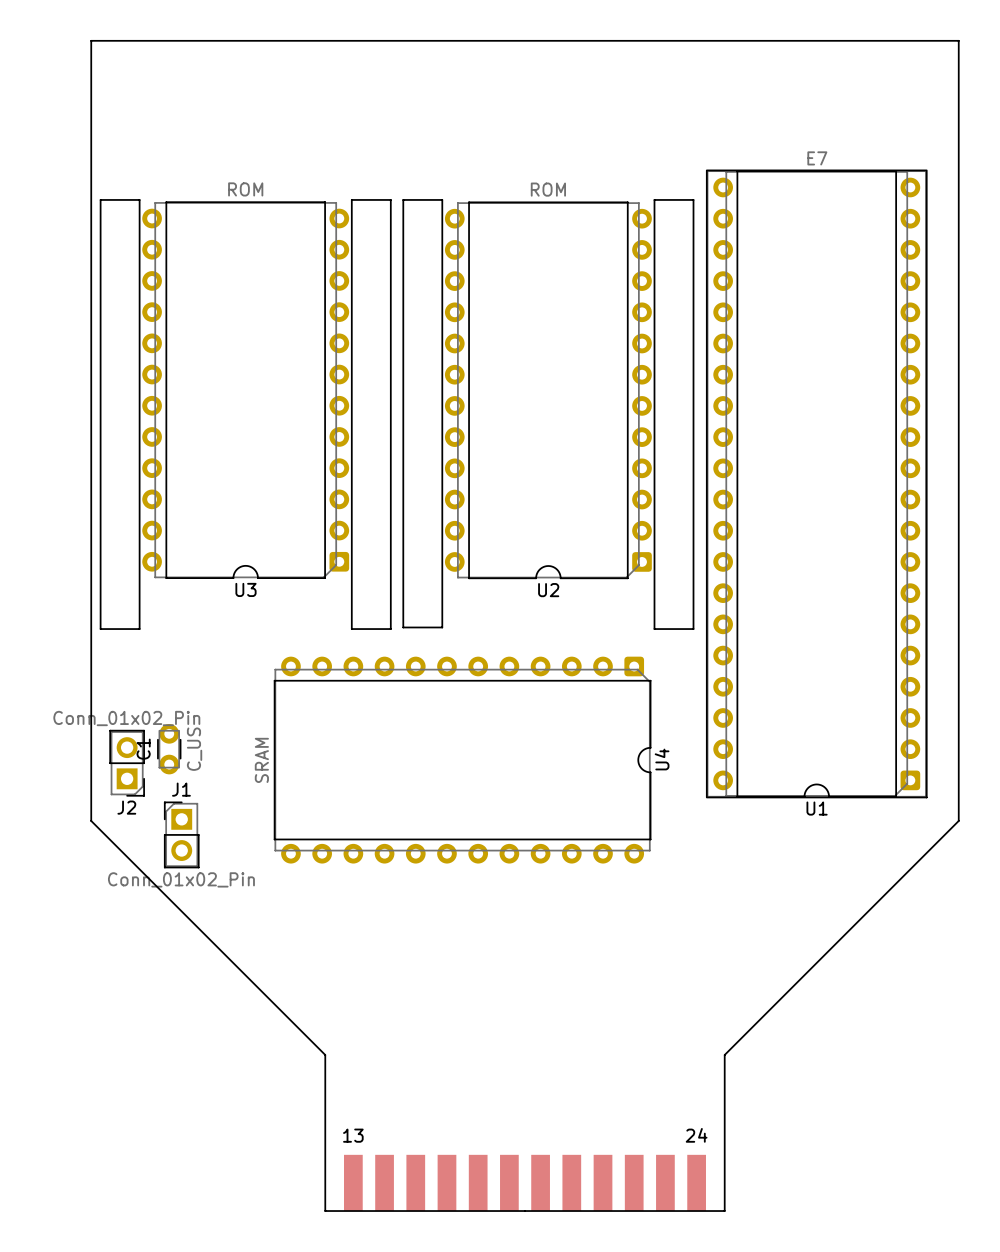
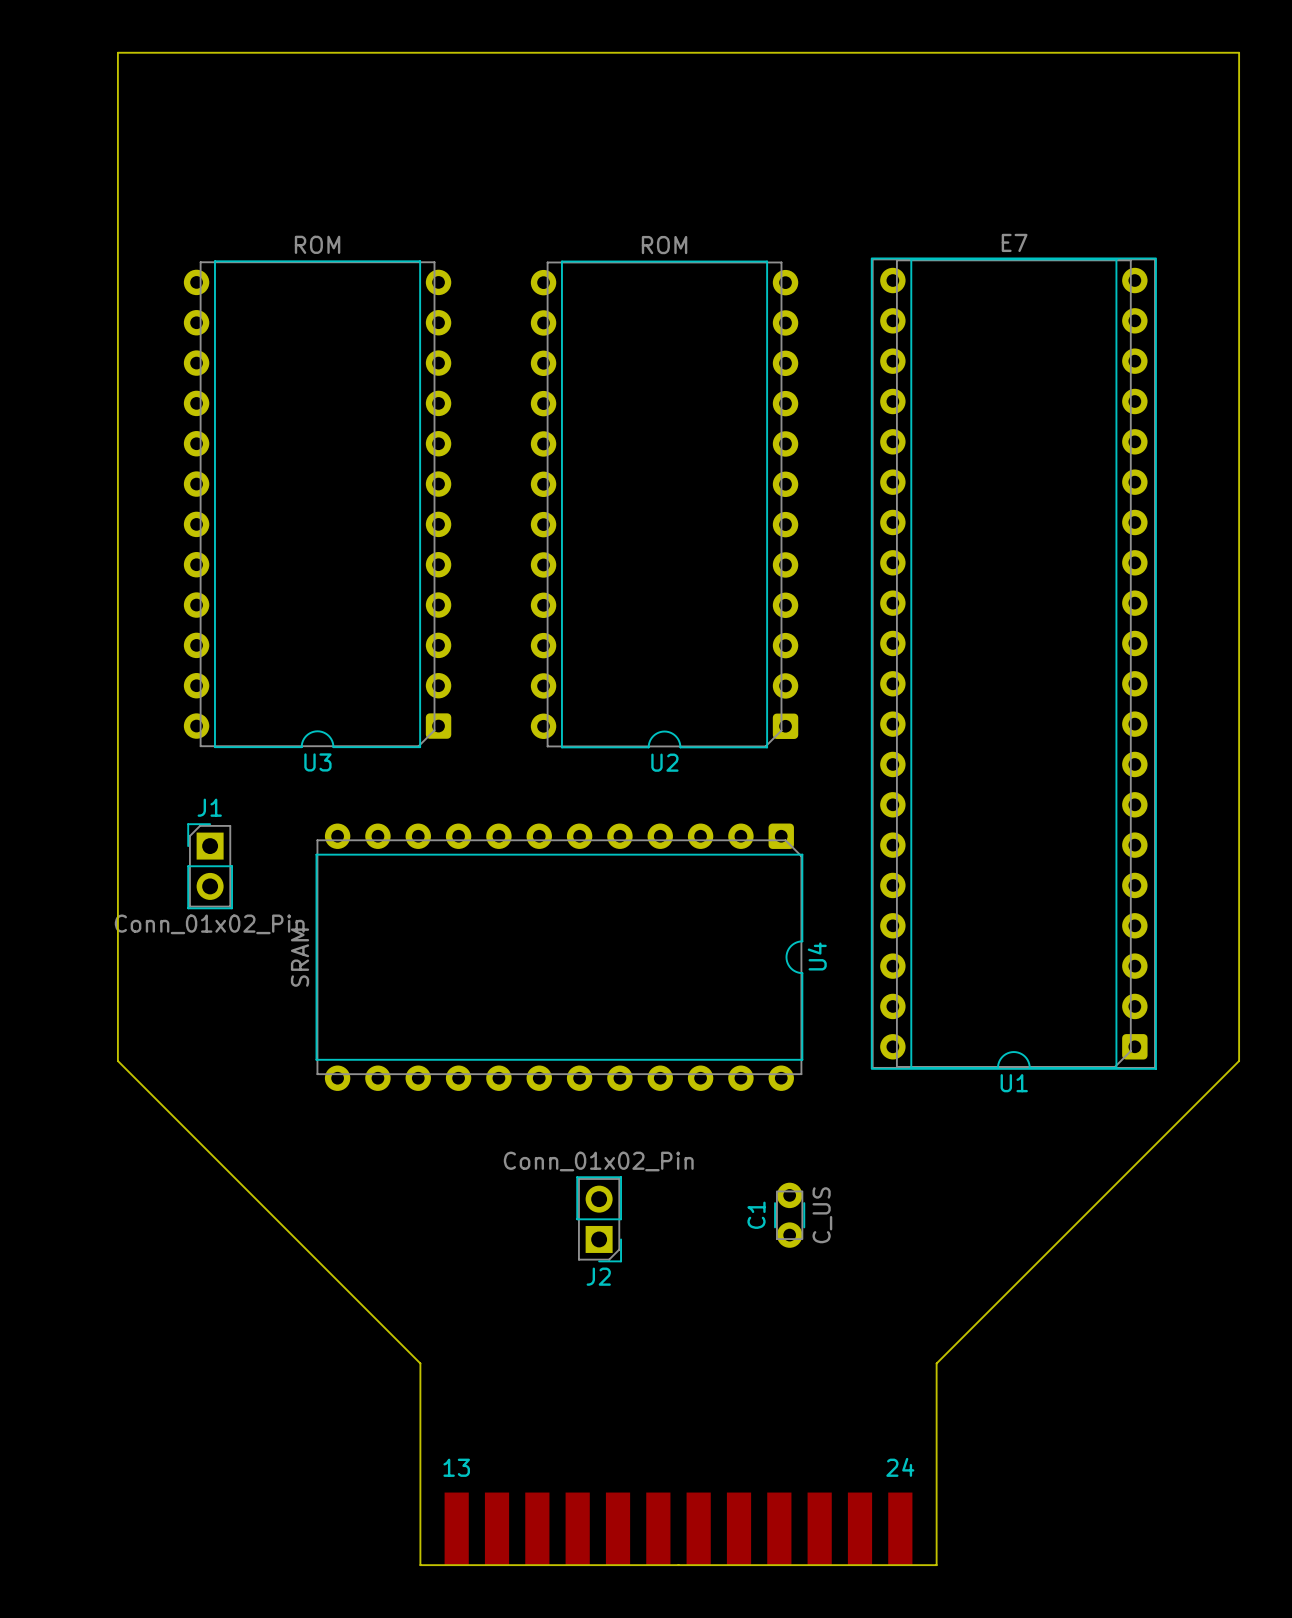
line: (100, 199) (139, 199) (139, 629) (100, 629) (100, 199) -> none
line: (351, 199) (390, 199) (390, 629) (351, 629) (351, 199) -> none
line: (403, 199) (442, 199) (442, 627) (403, 627) (403, 199) -> none
line: (654, 199) (693, 199) (693, 629) (654, 629) (654, 199) -> none
U2 position: (548, 390) -> (664, 504)
U1 position: (816, 483) -> (1013, 663)
C1 position: (169, 749) -> (789, 1215)
U4 position: (462, 760) -> (559, 957)
J2 position: (127, 763) -> (599, 1219)
J1 position: (181, 834) -> (210, 866)

